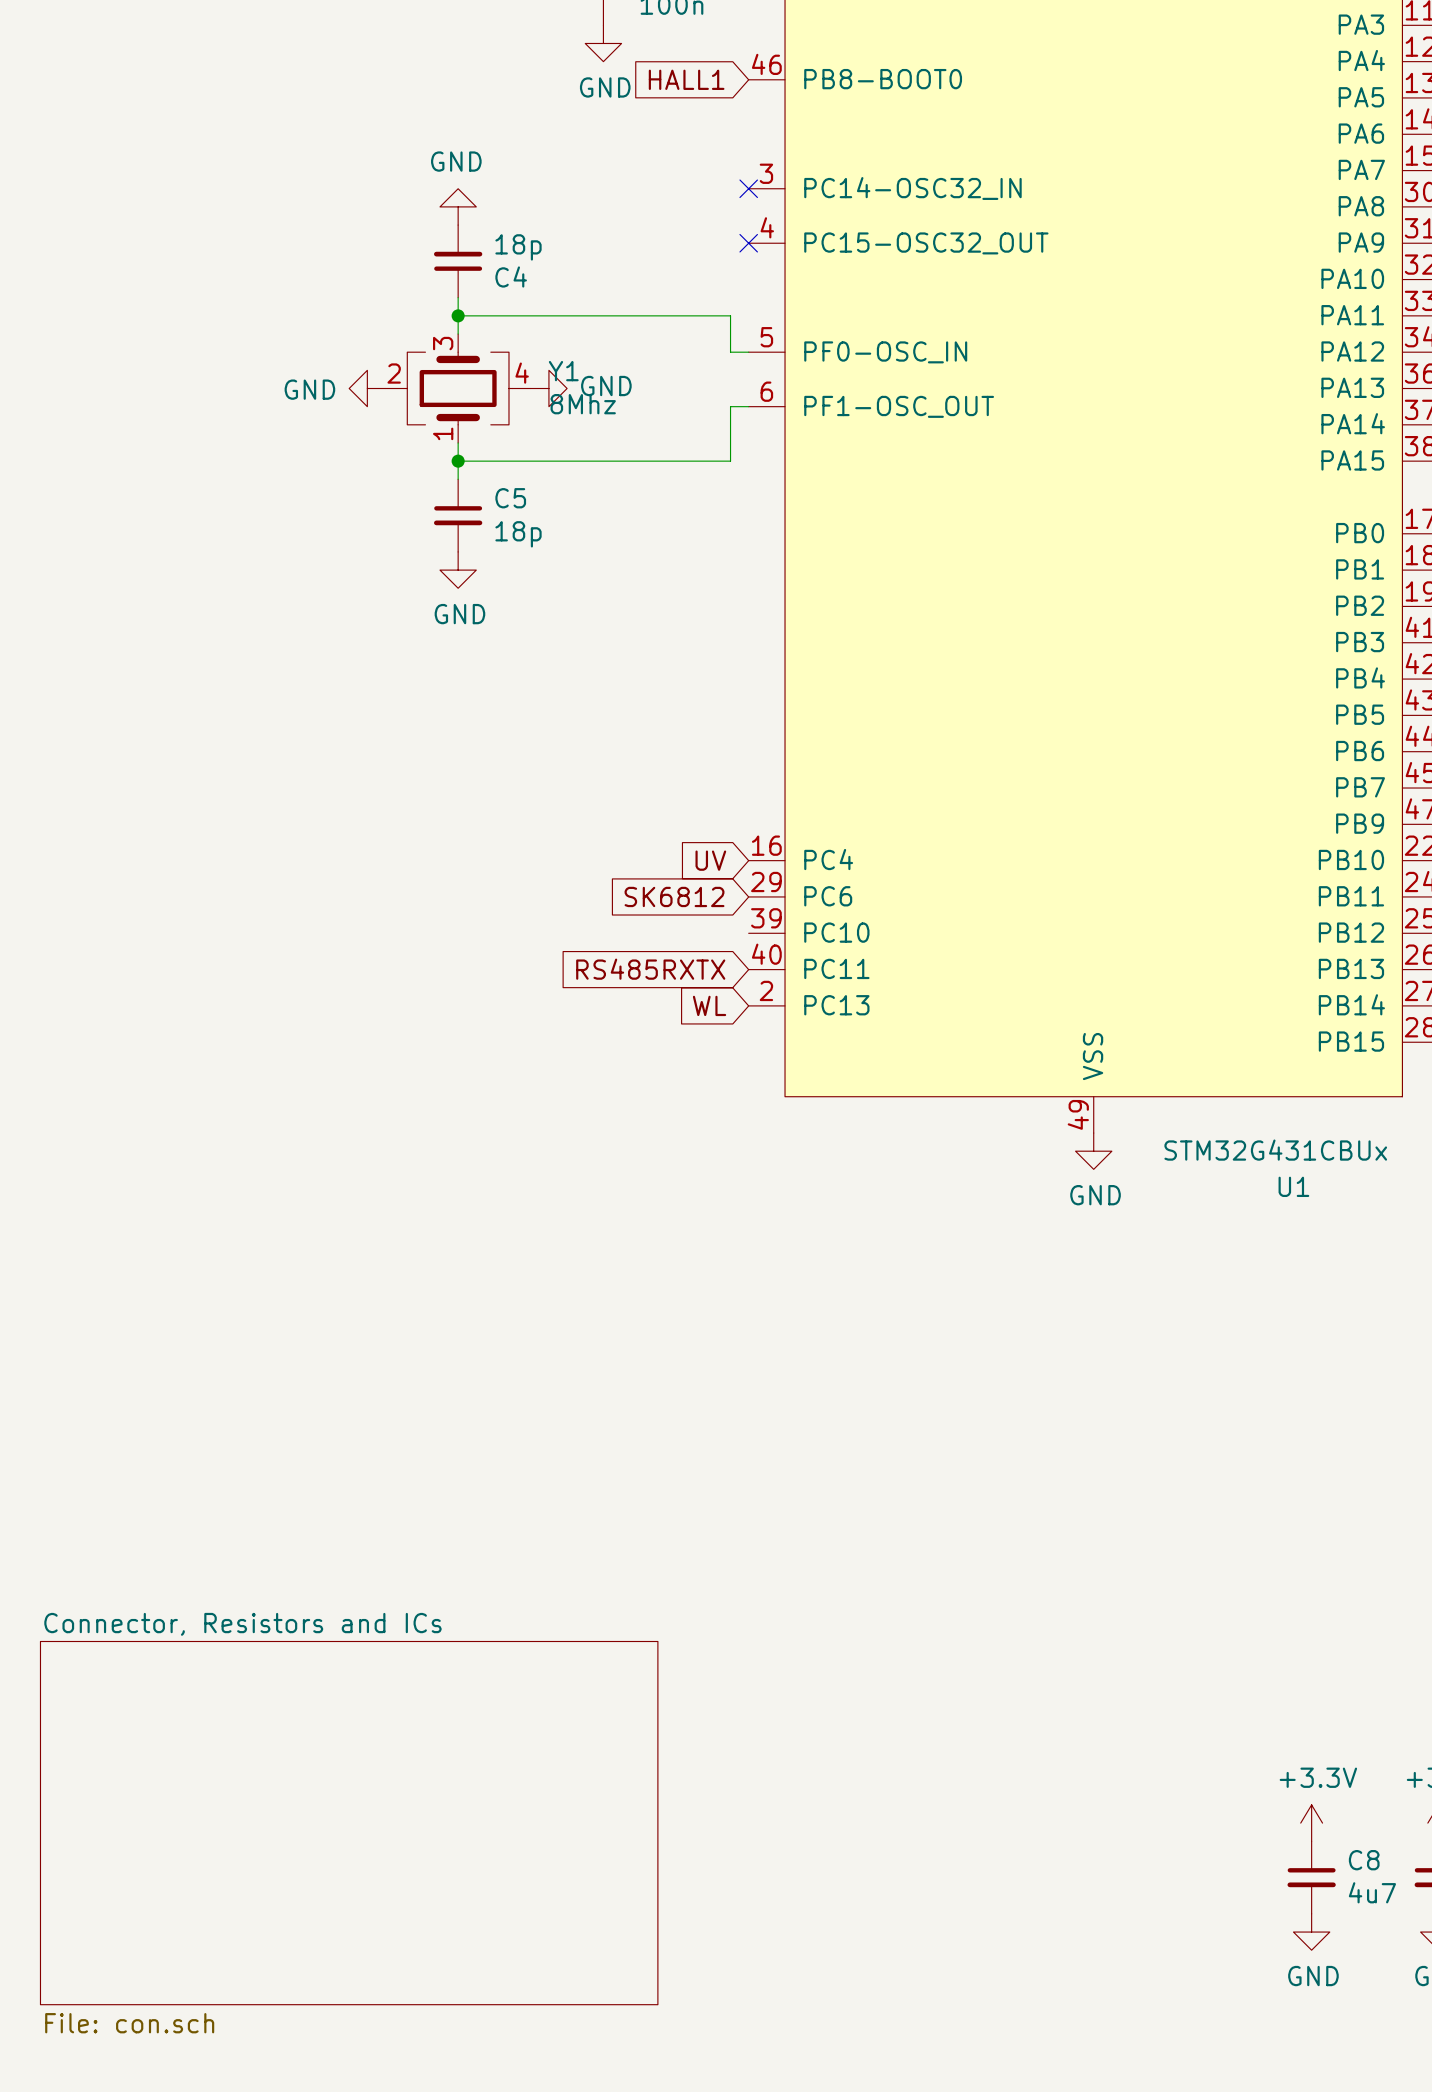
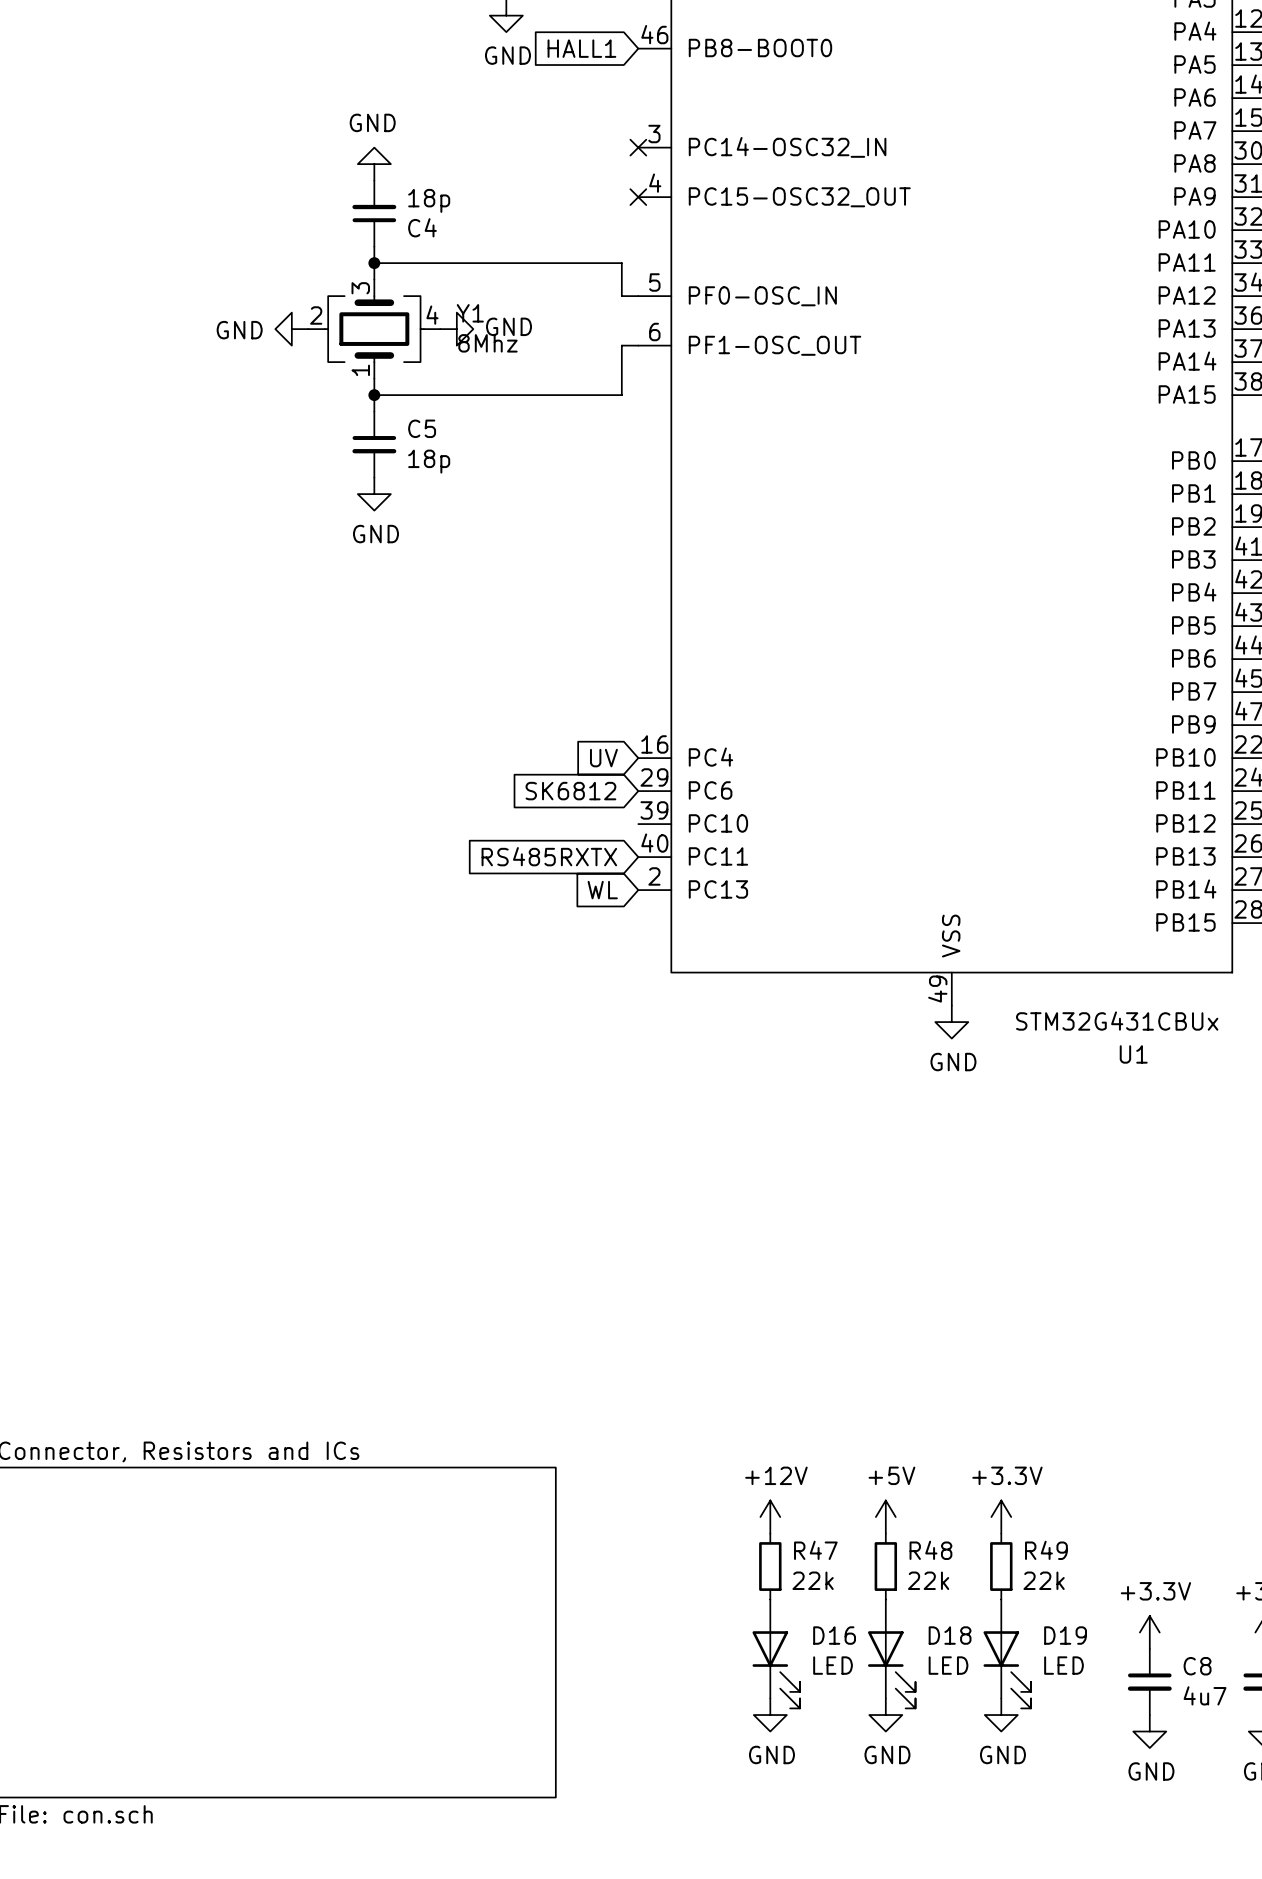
power symbol: none -> +12V (770, 1517)
power symbol: none -> +5V (885, 1517)
power symbol: none -> +3.3V (1001, 1517)
R47: none -> 22k (770, 1566)
R48: none -> 22k (885, 1566)
R49: none -> 22k (1001, 1566)
D16: none -> LED (776, 1653)
D18: none -> LED (891, 1653)
D19: none -> LED (1007, 1653)
power symbol: none -> GND (770, 1715)
power symbol: none -> GND (885, 1715)
power symbol: none -> GND (1001, 1715)

